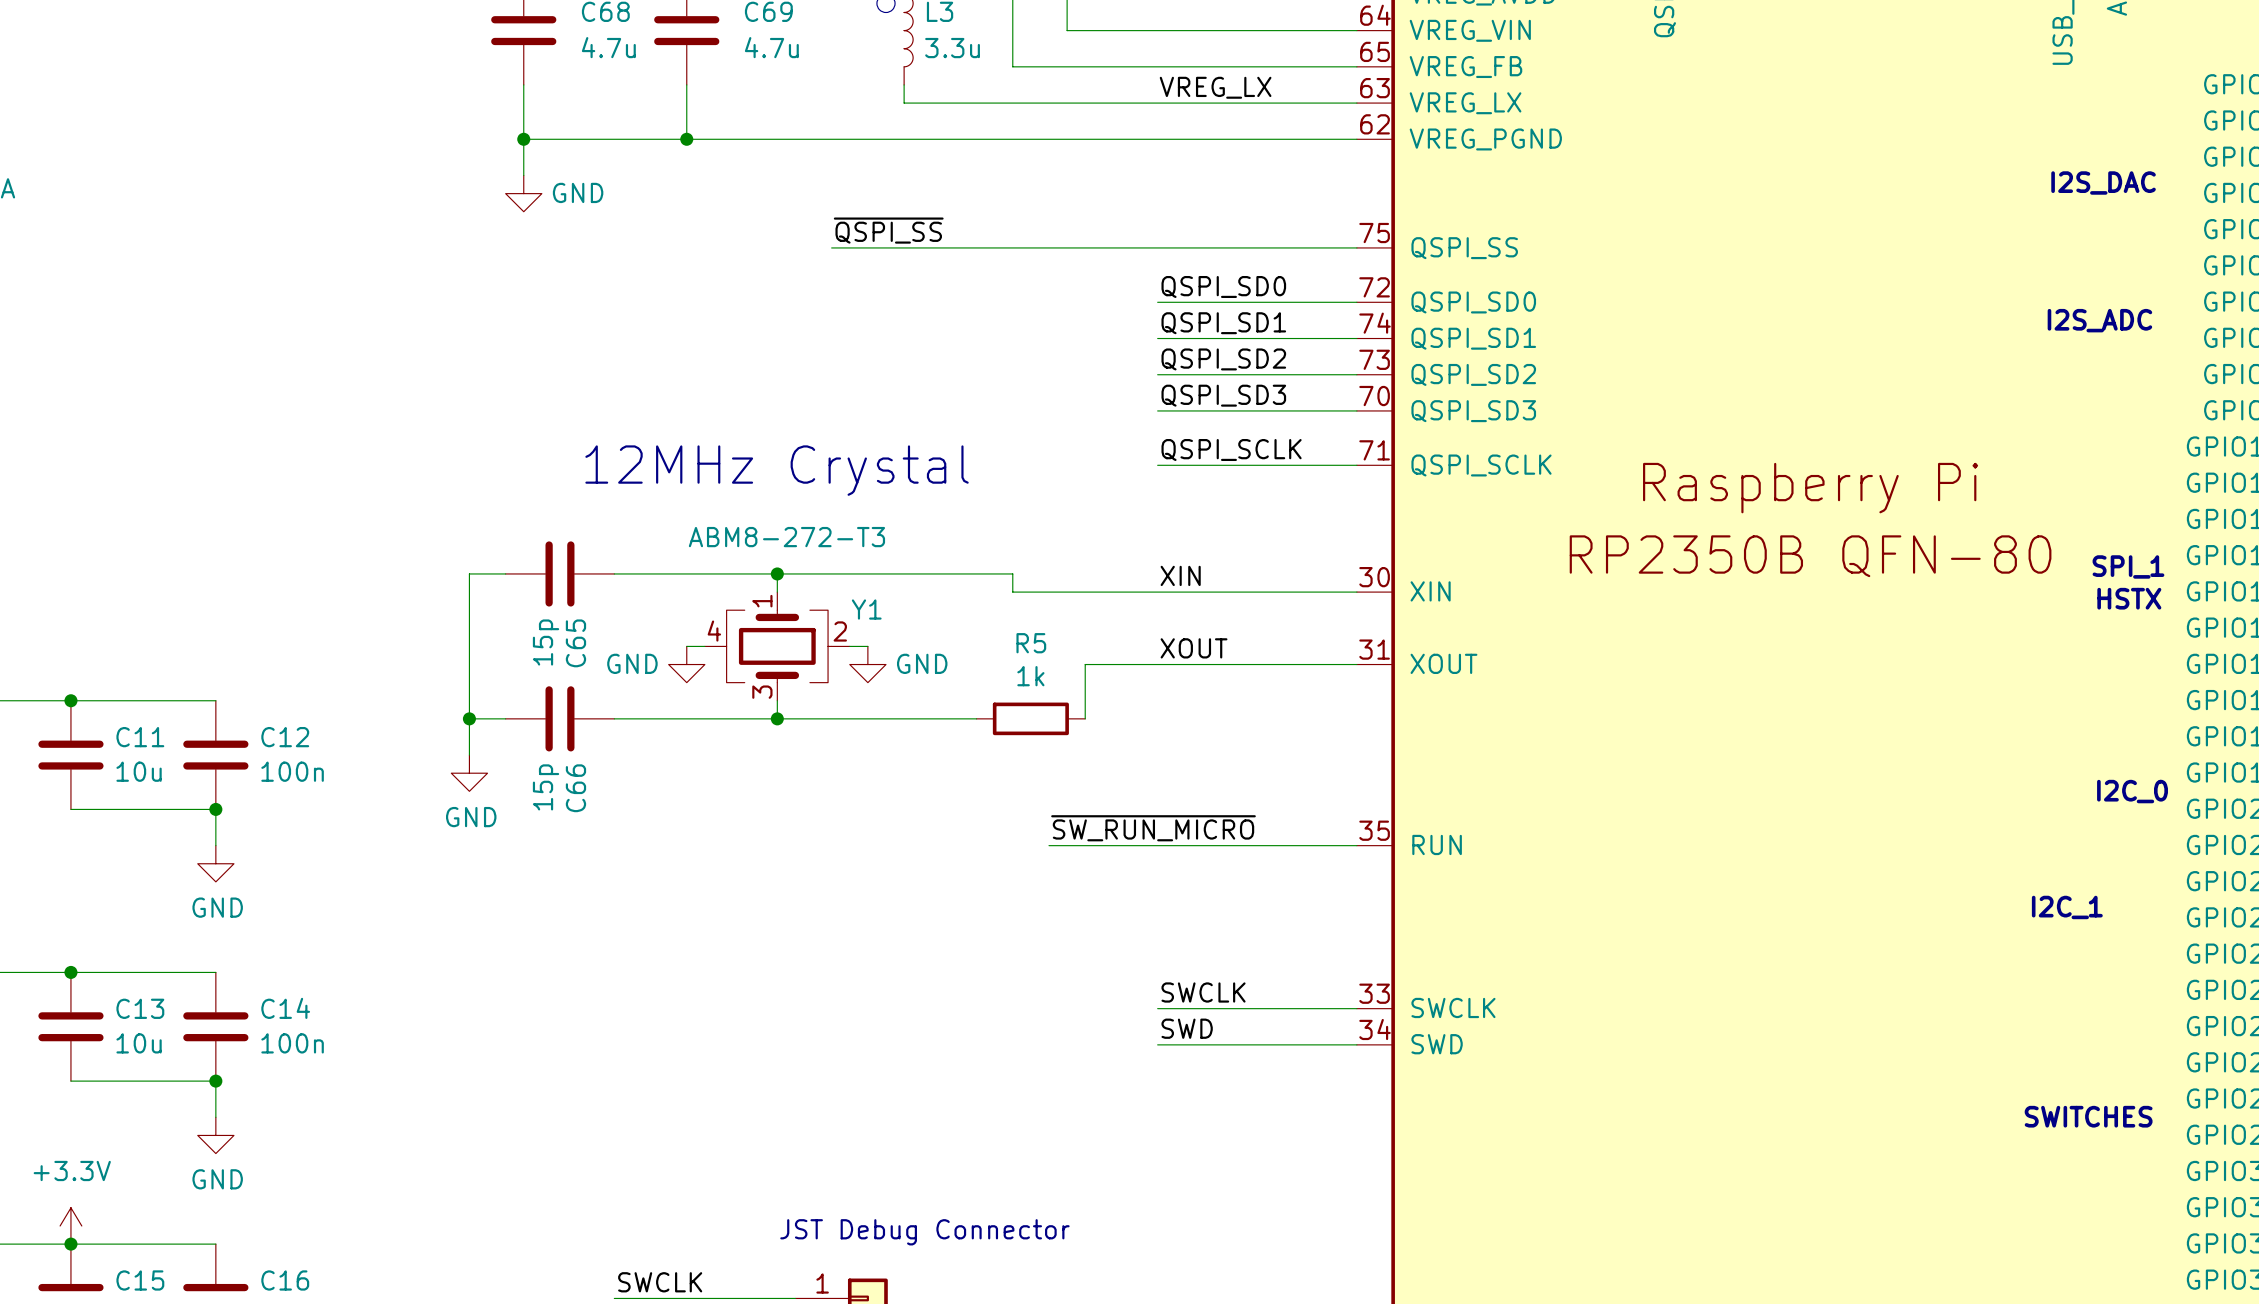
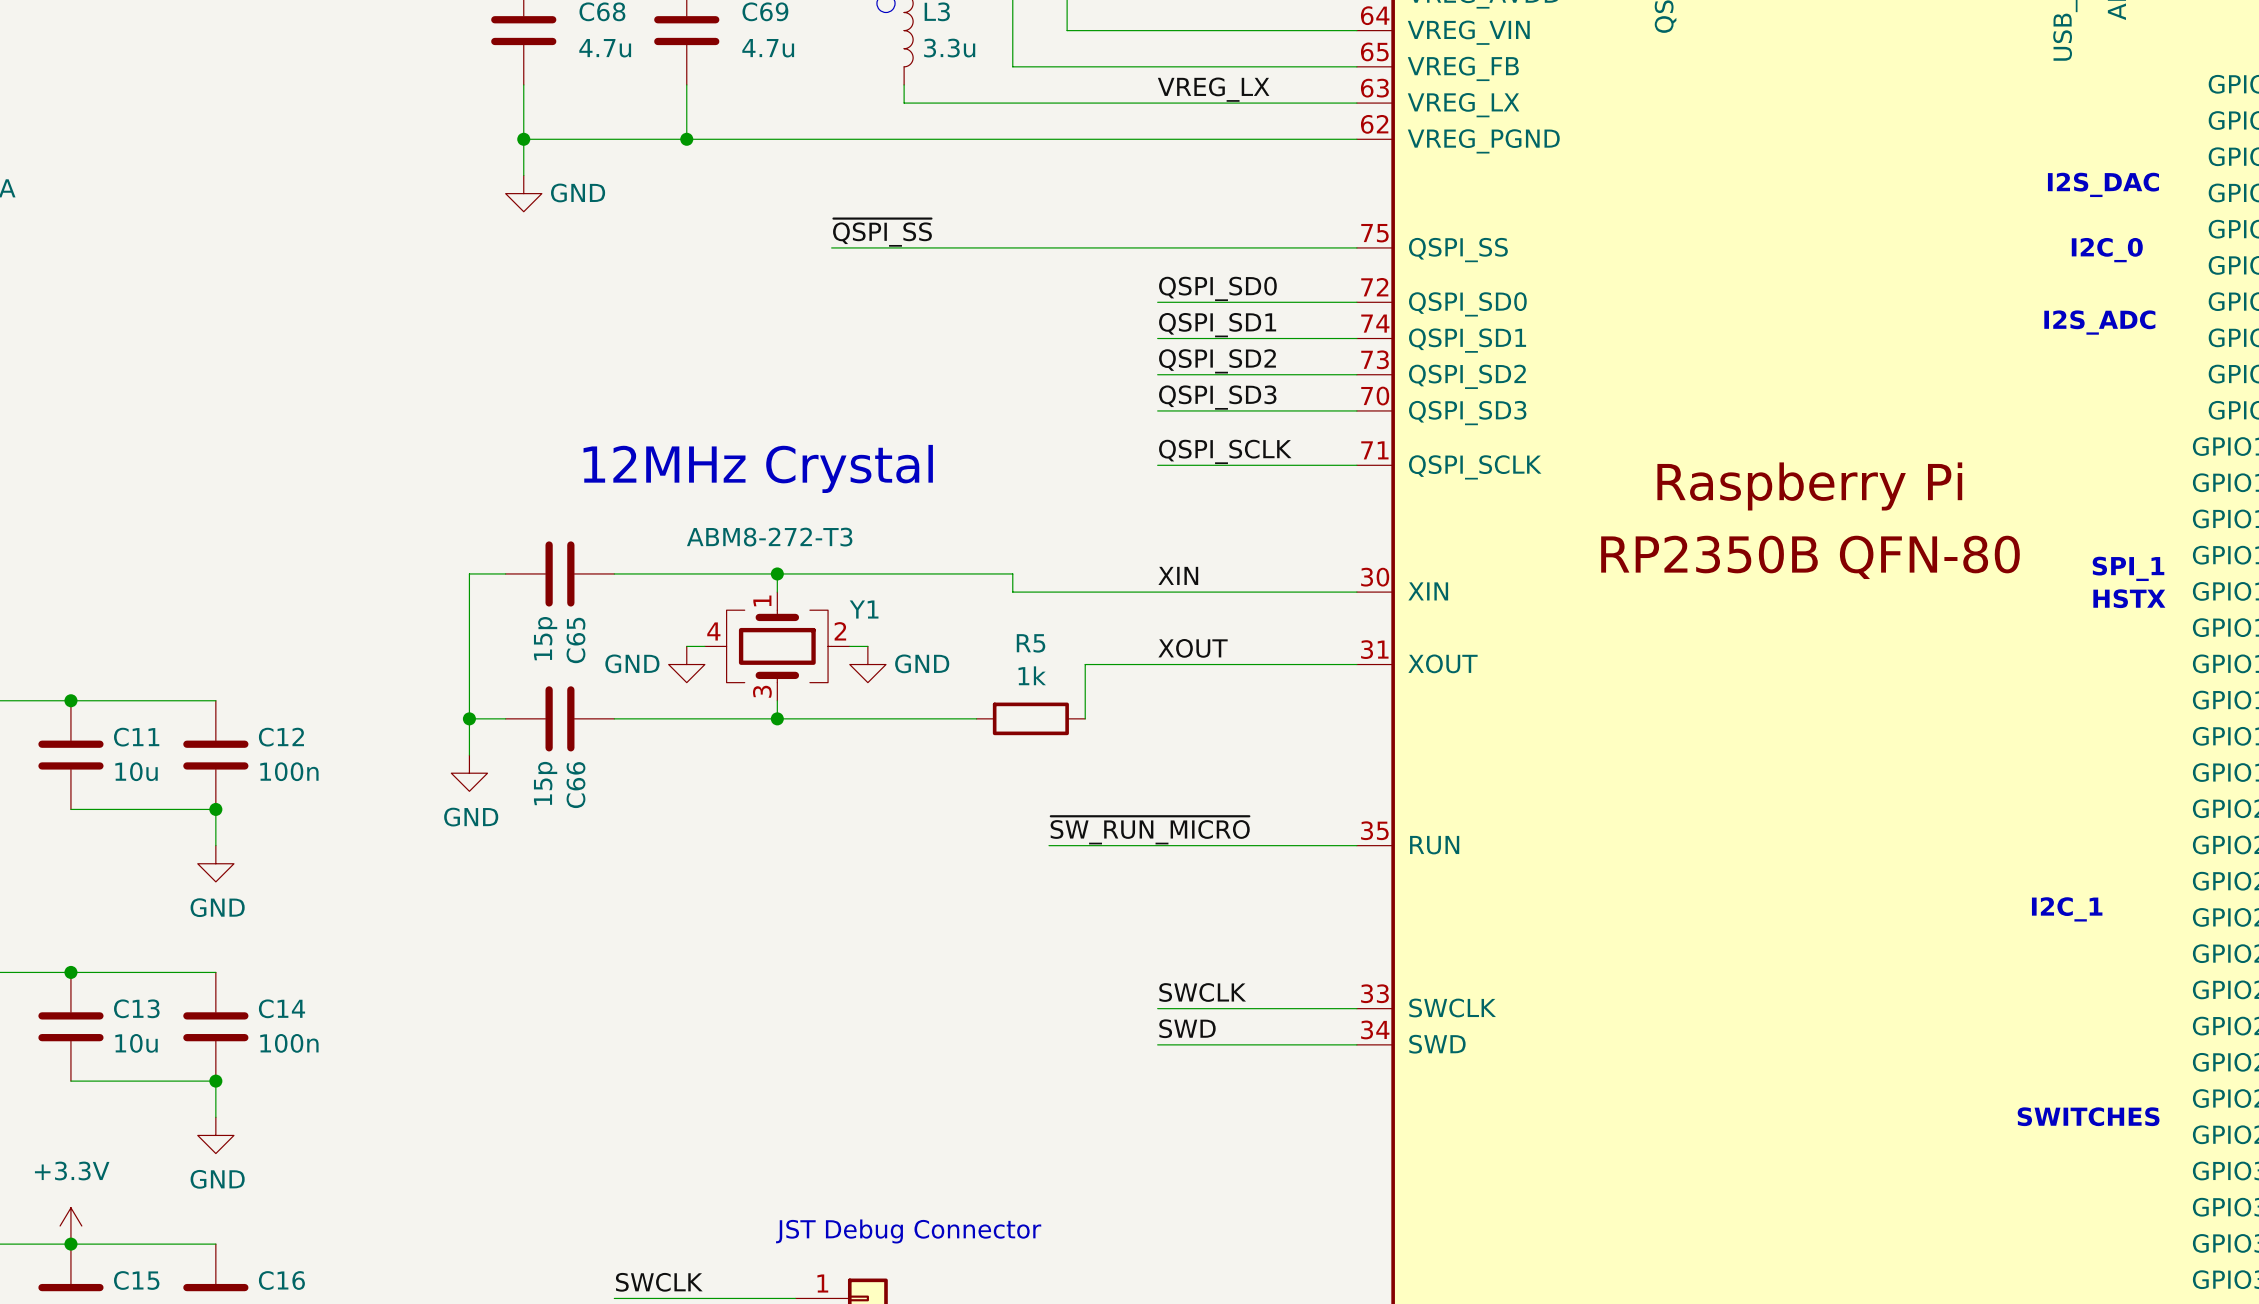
text: none -> I2C_0 (2107, 250)
text: I2C_0 (2132, 791) -> none

